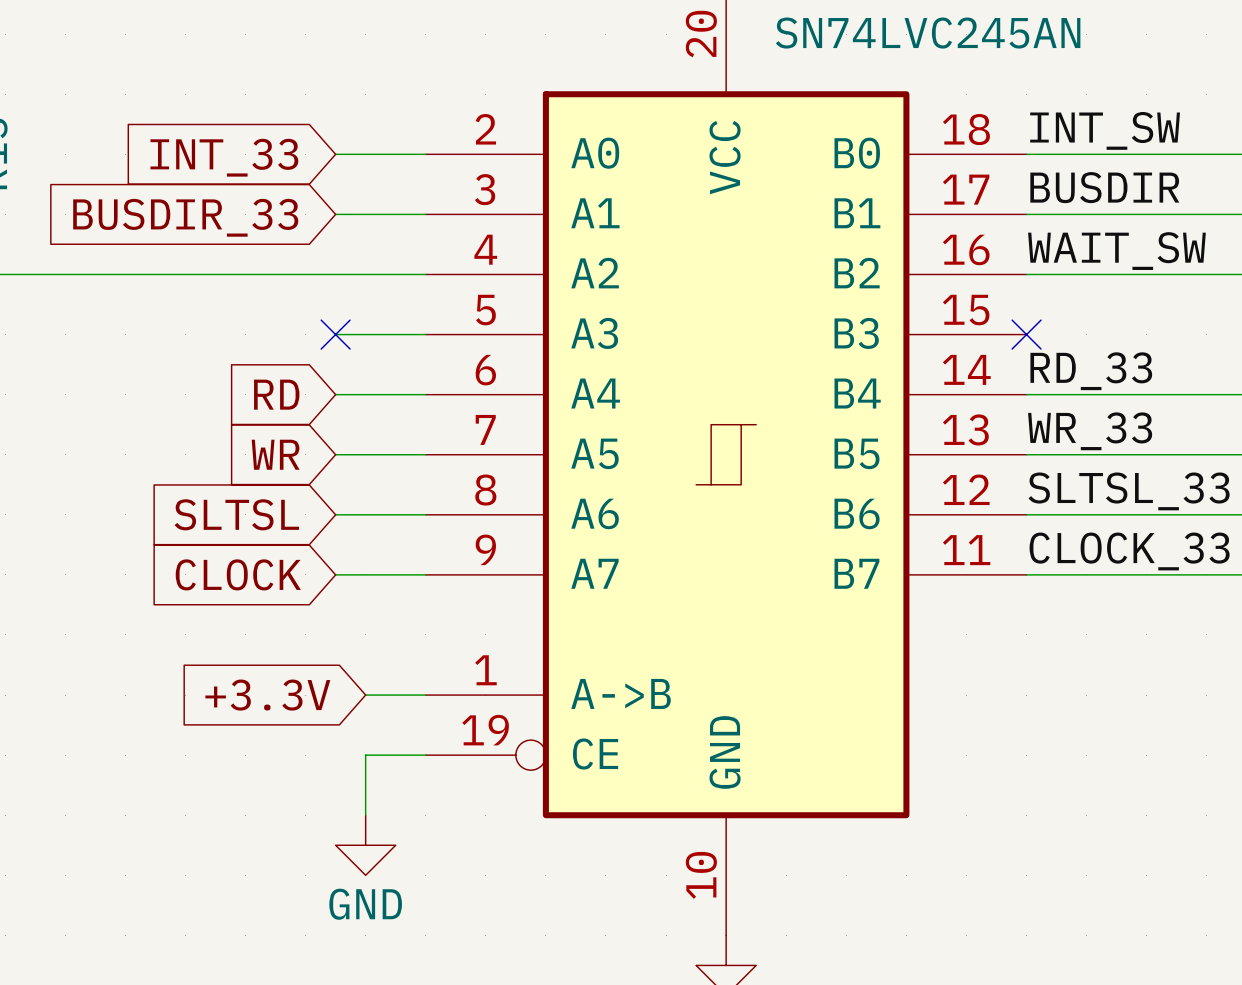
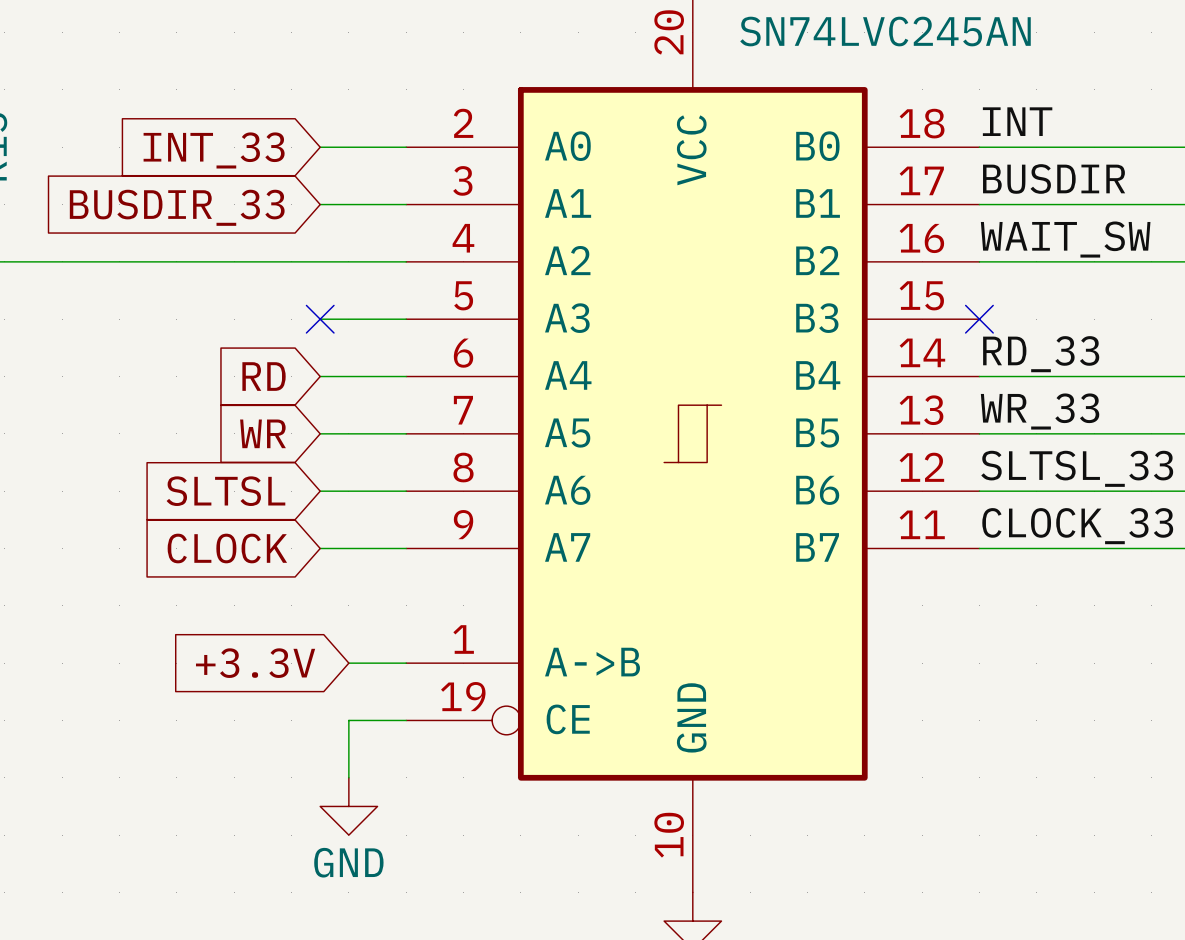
label: INT_SW (1105, 130) -> INT (1017, 121)

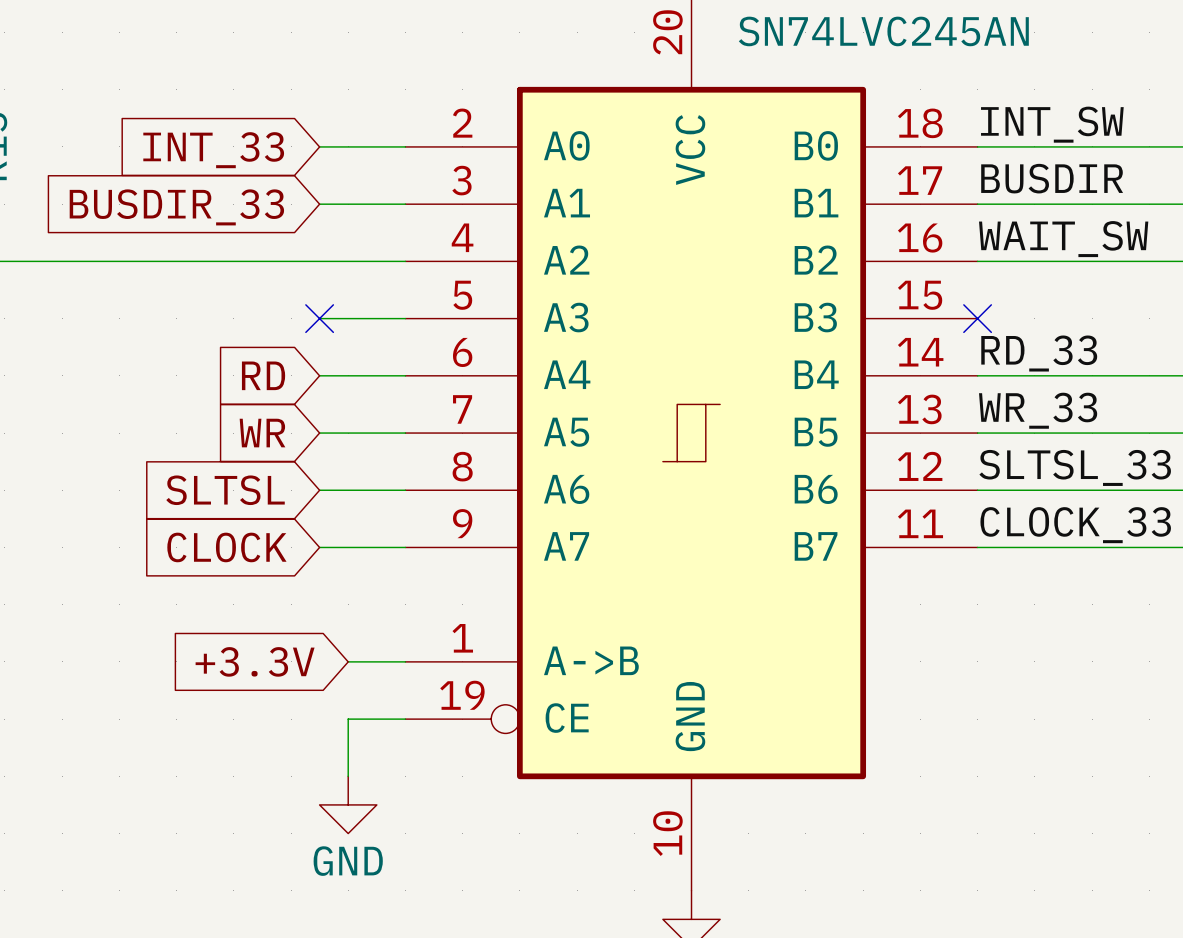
label: INT (1017, 121) -> INT_SW (1052, 124)

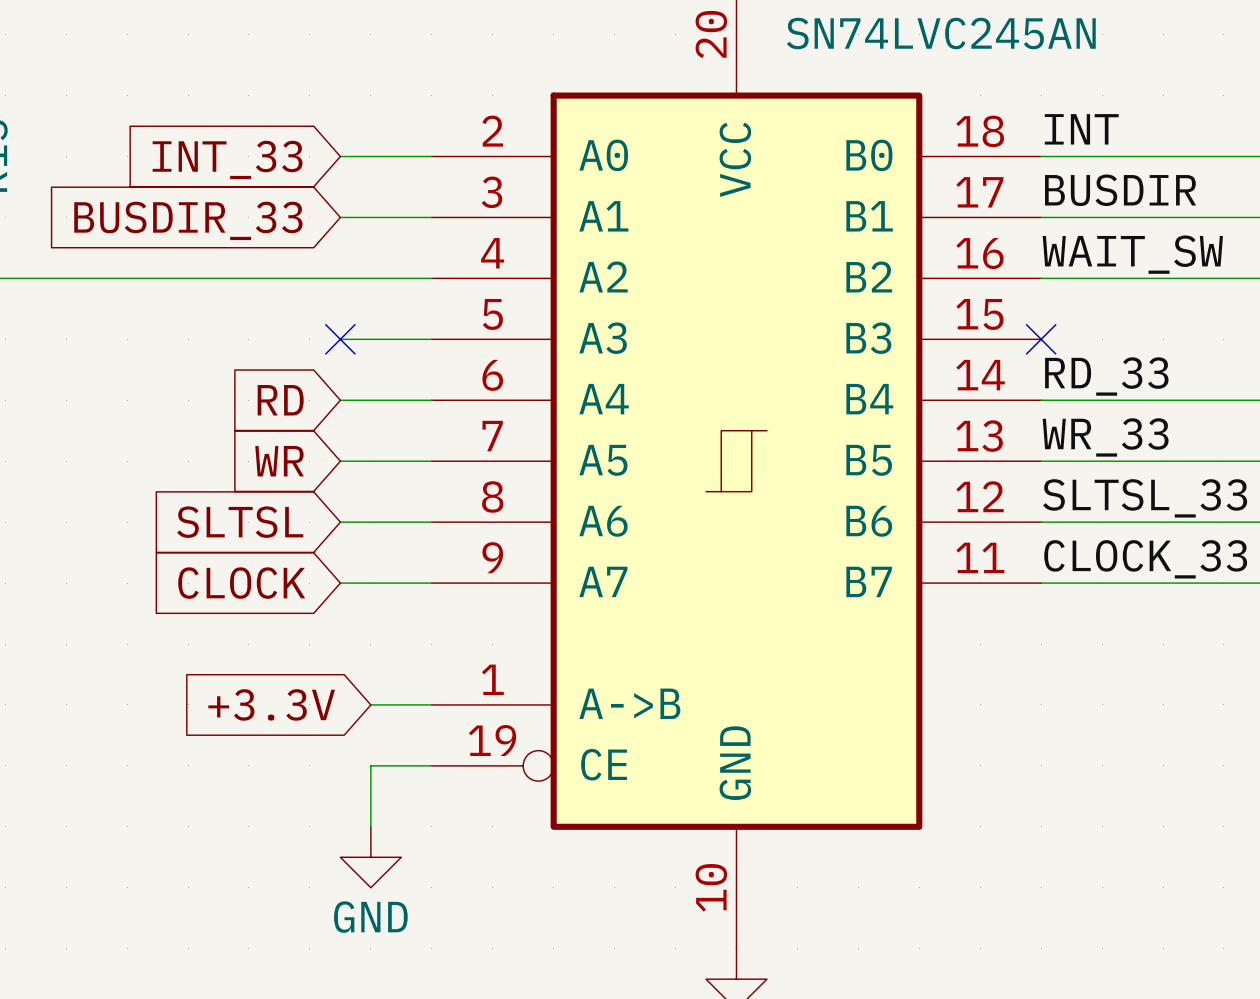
label: INT_SW (1052, 124) -> INT (1081, 129)

